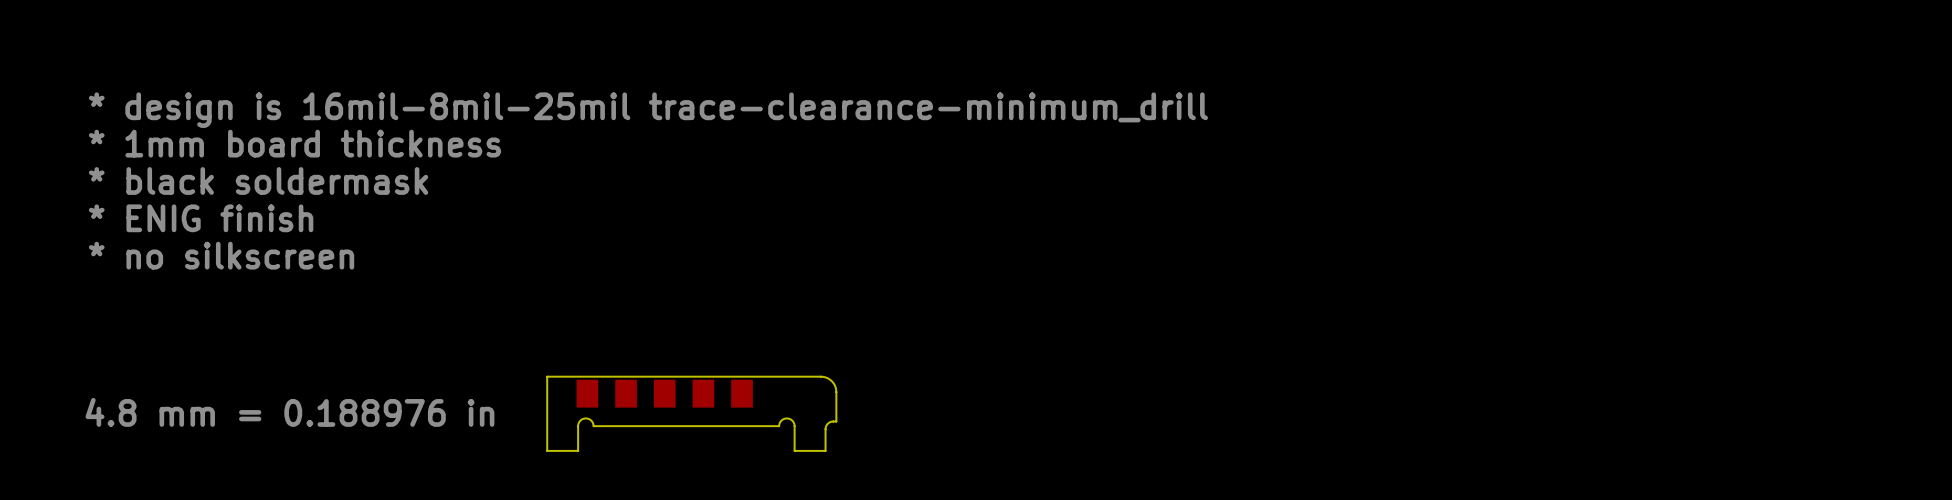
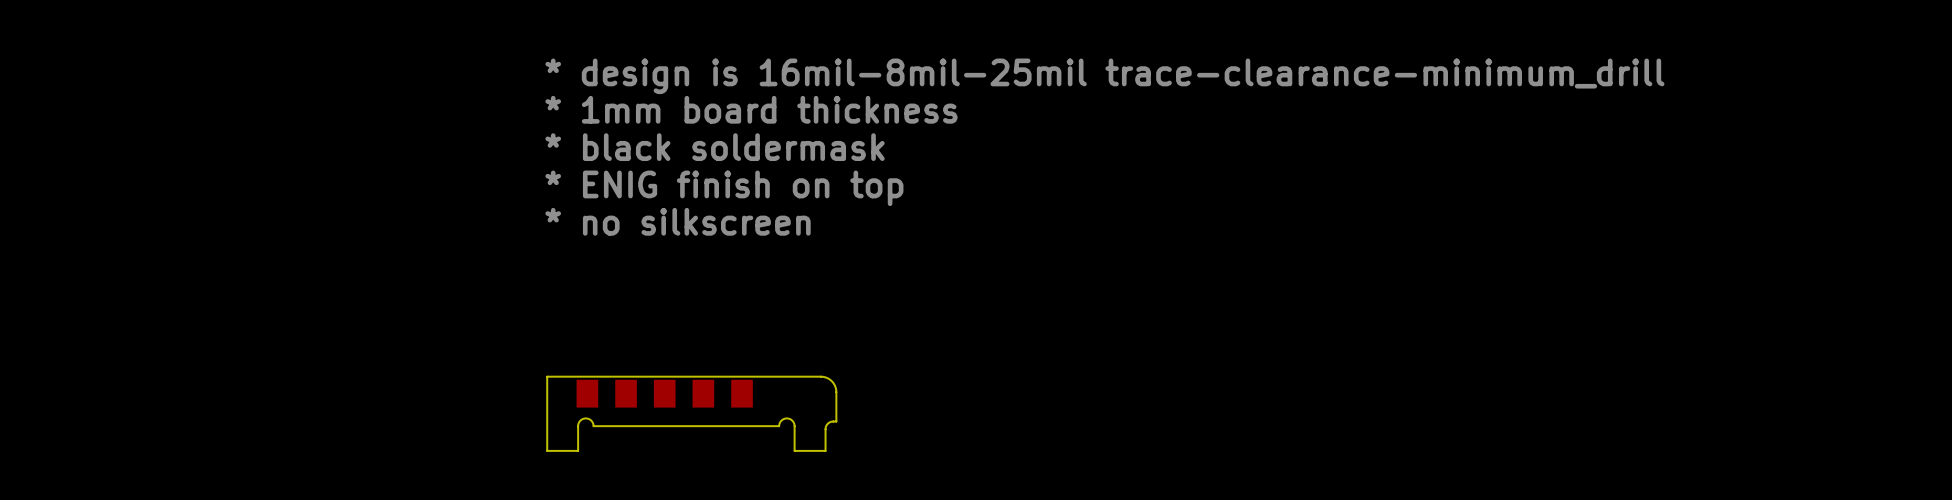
text: none -> * design is 16mil-8mil-25mil trace-clearance-minimum_drill (1104, 76)
text: none -> * 1mm board thickness (751, 109)
text: * design is 16mil-8mil-25mil trace-clearance-minimum_drill (648, 110) -> none
text: * 1mm board thickness (294, 143) -> none
text: none -> * black soldermask (715, 147)
text: * black soldermask (258, 180) -> none
text: none -> * ENIG finish on top (724, 188)
text: * ENIG finish (201, 218) -> none
text: none -> * no silkscreen (678, 221)
text: * no silkscreen (221, 255) -> none
text: 4.8 mm = 0.188976 in (289, 412) -> none

